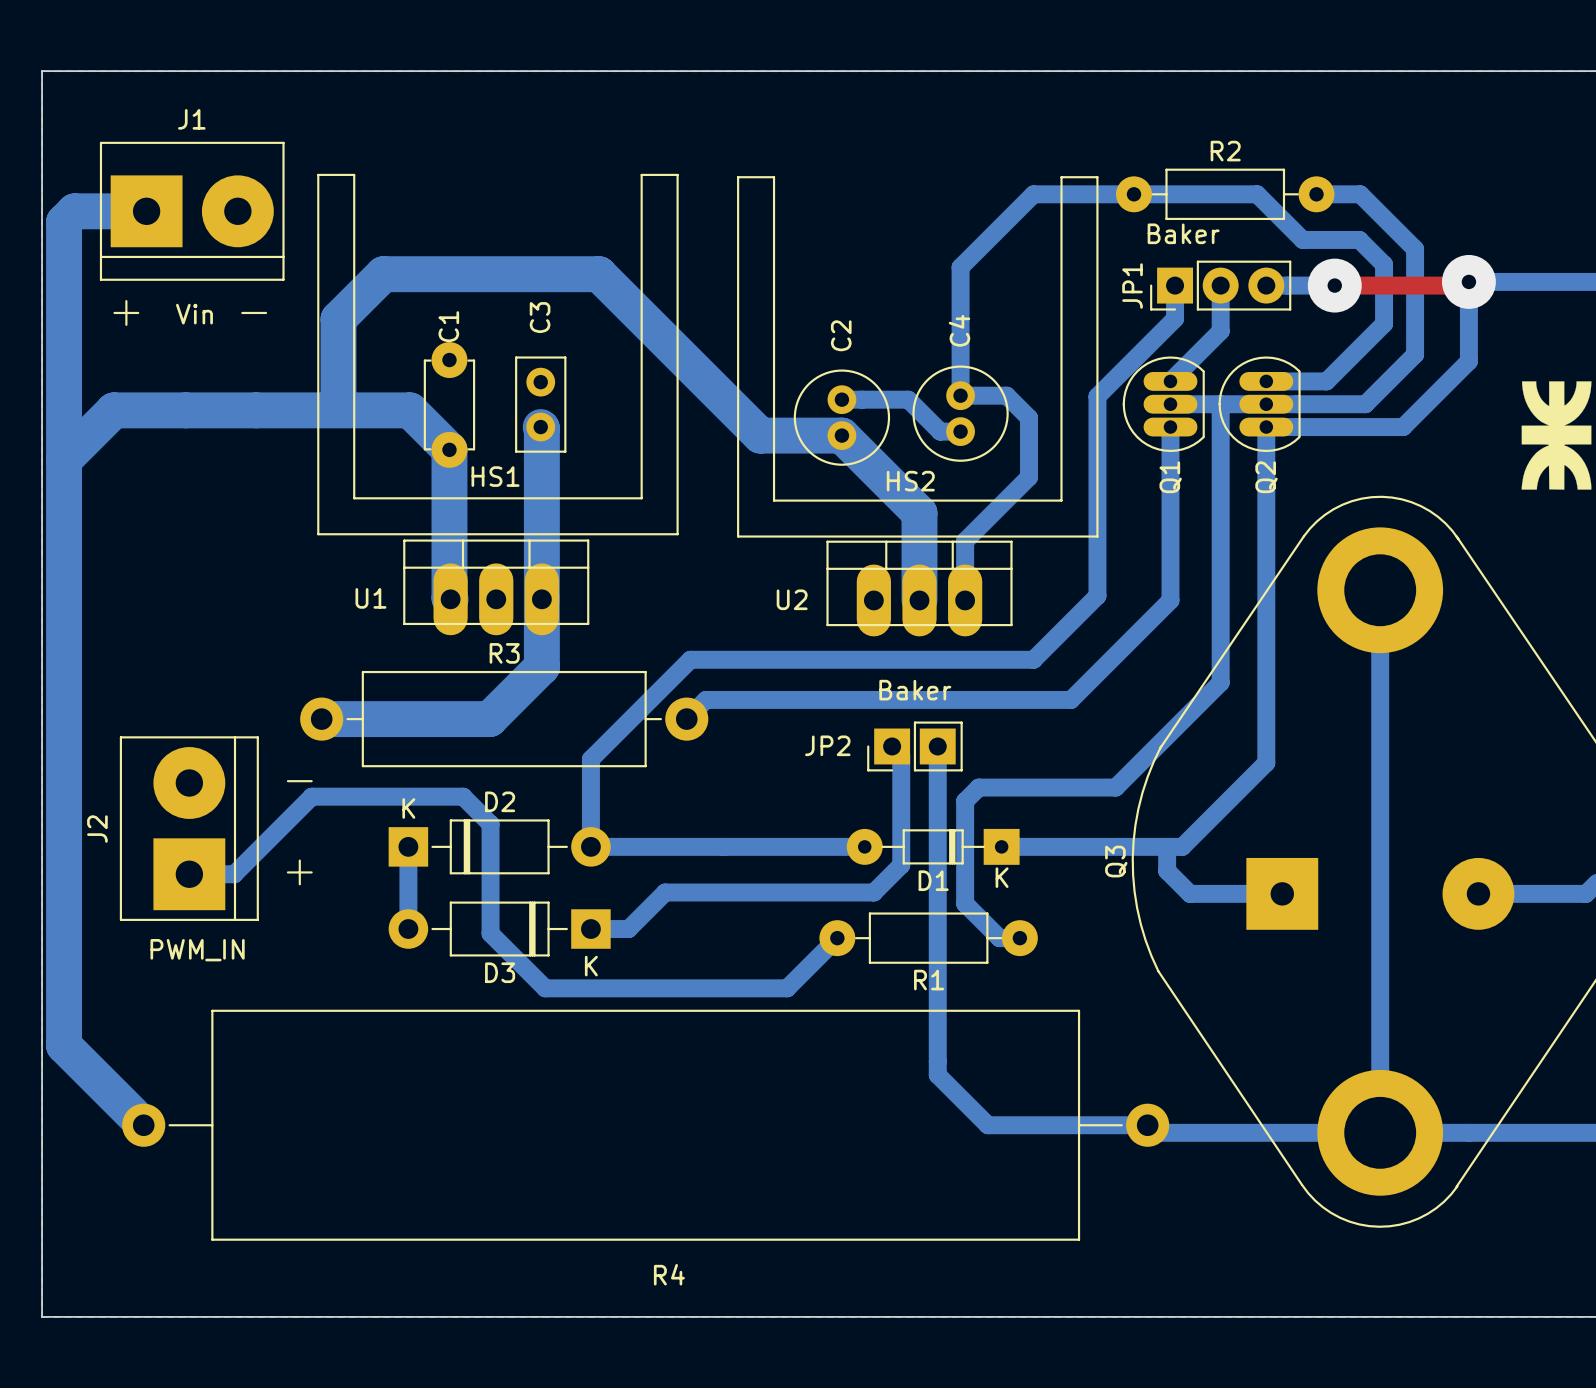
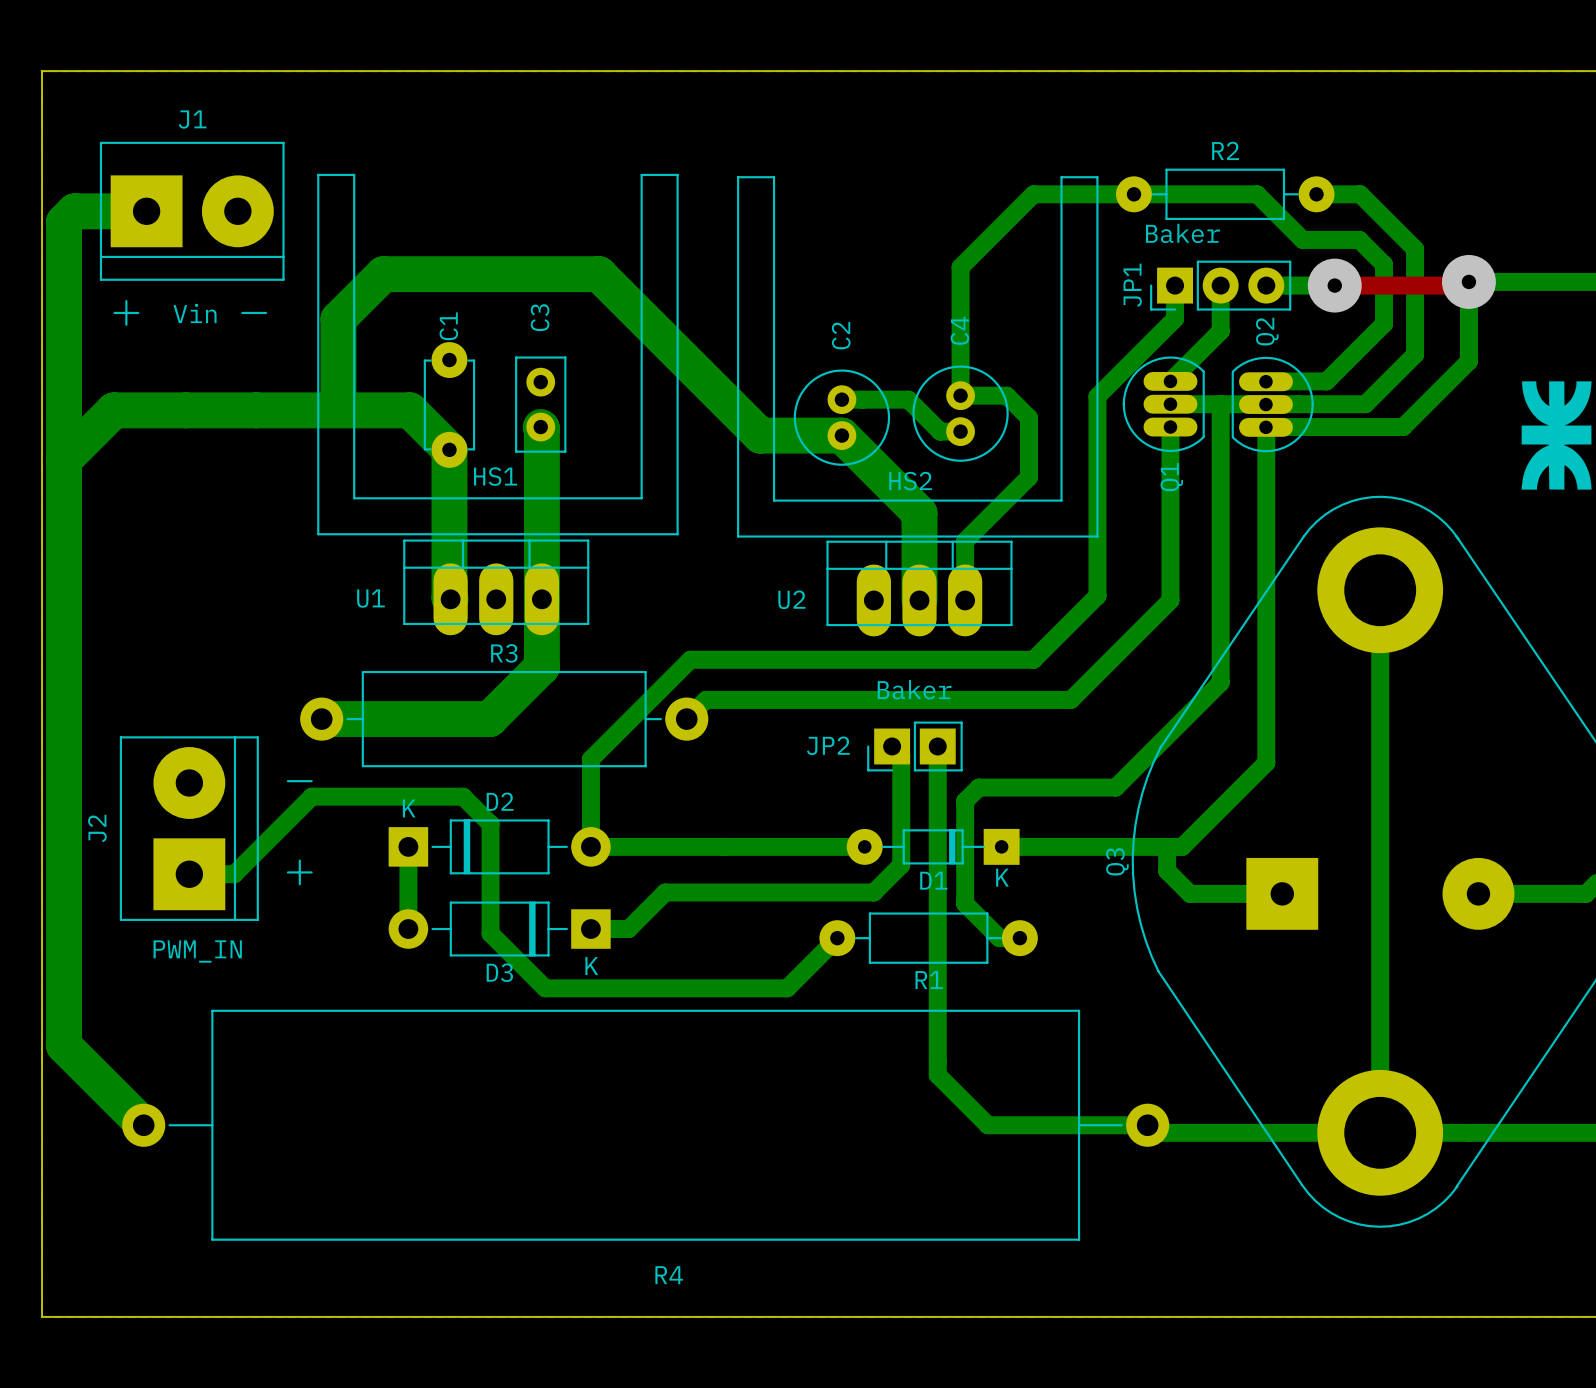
Q2 rotation: 0° (1259, 404) -> 180° (1272, 404)

